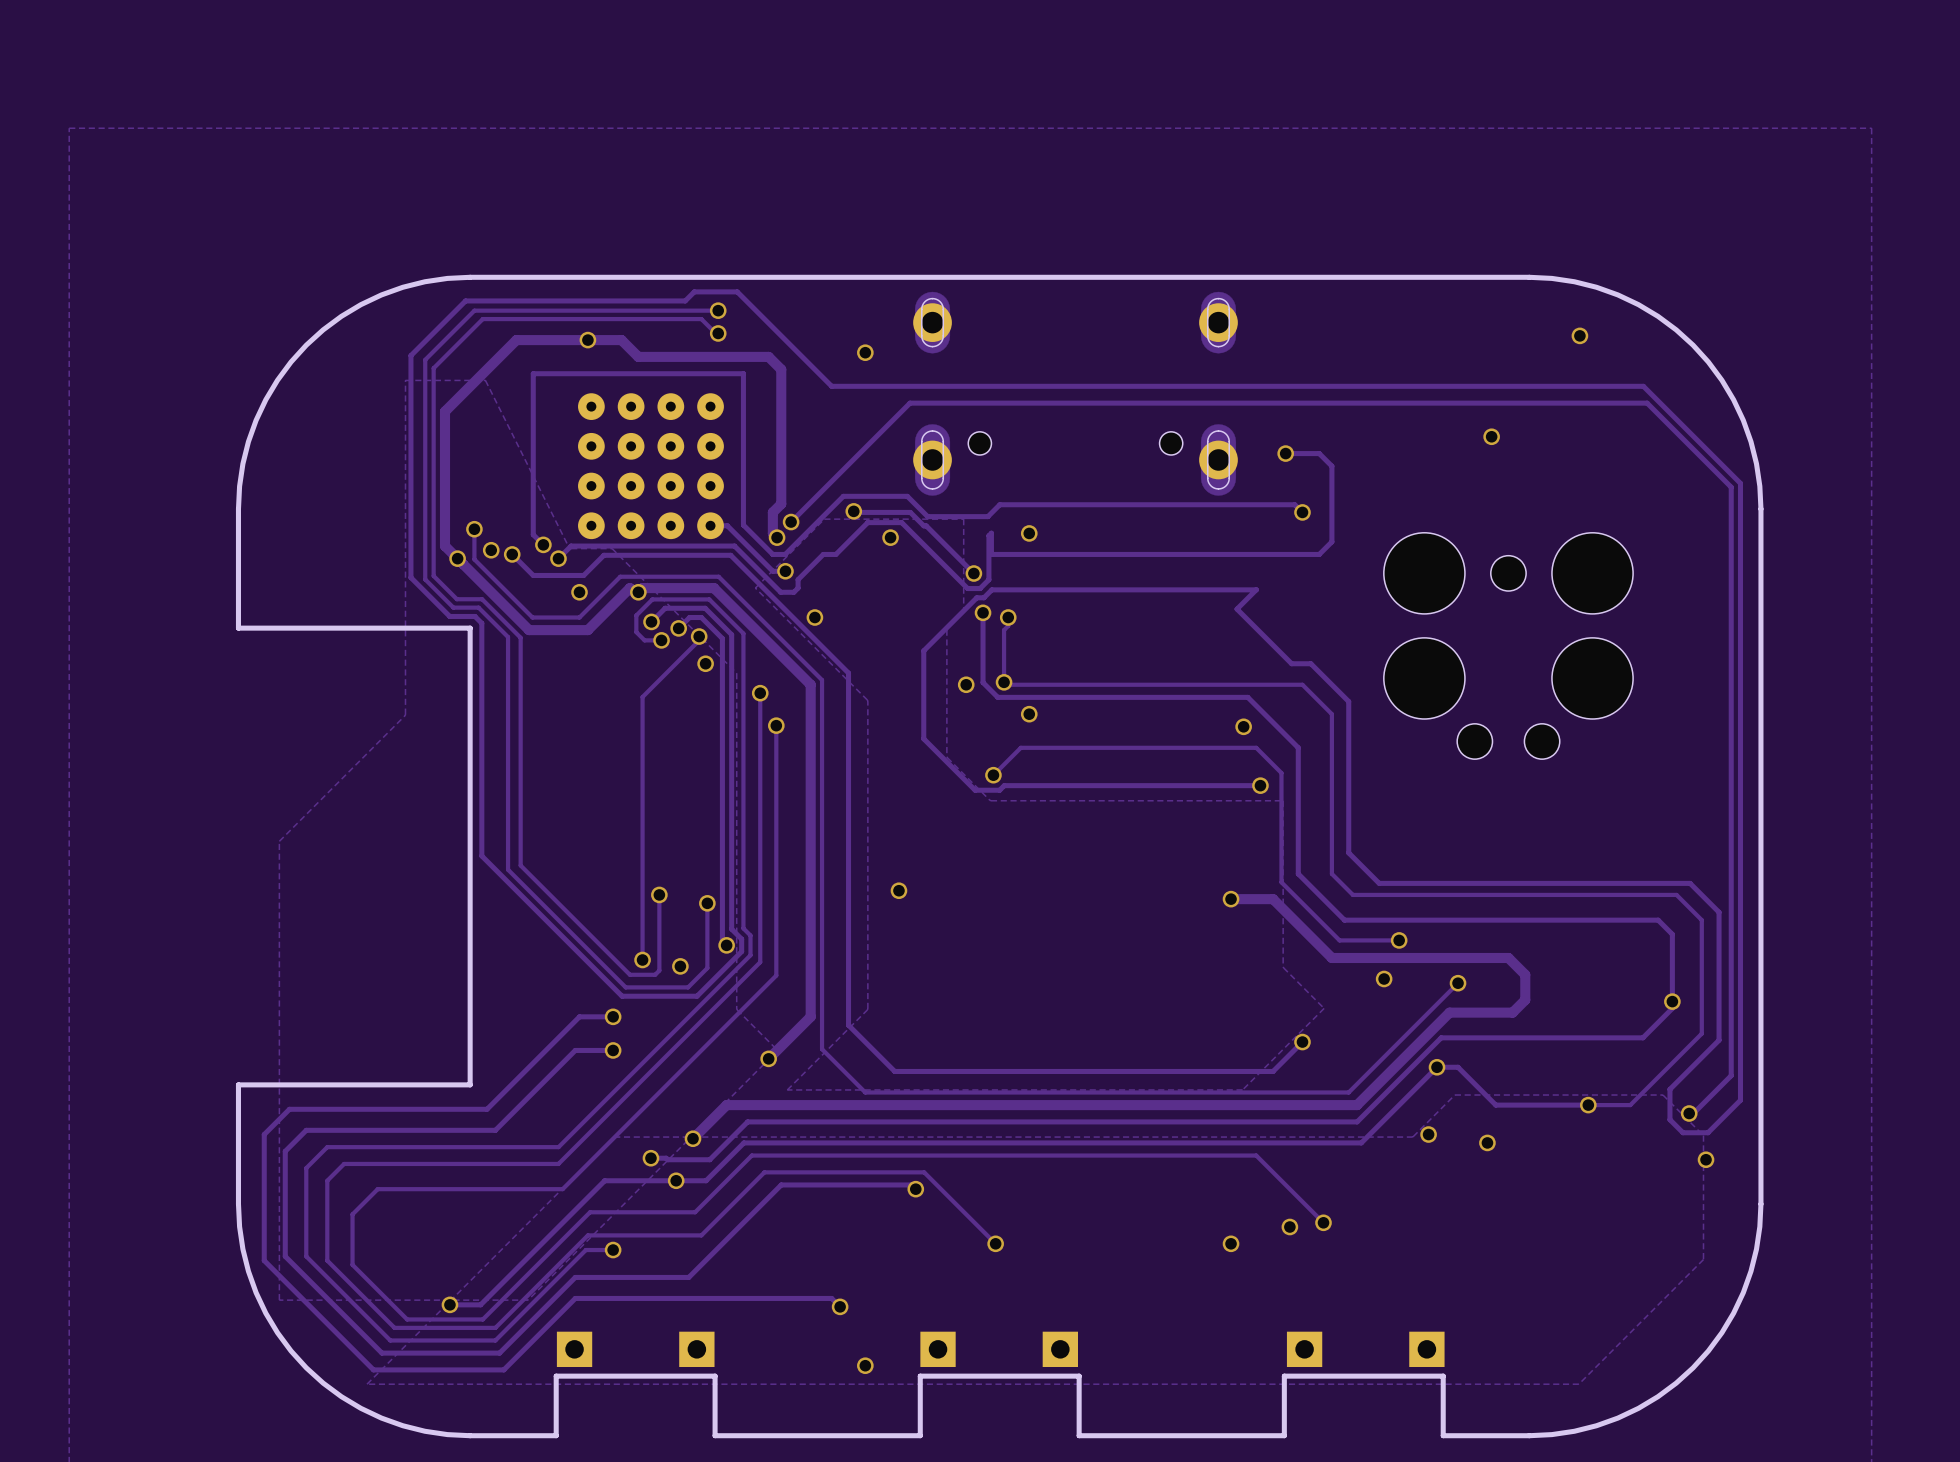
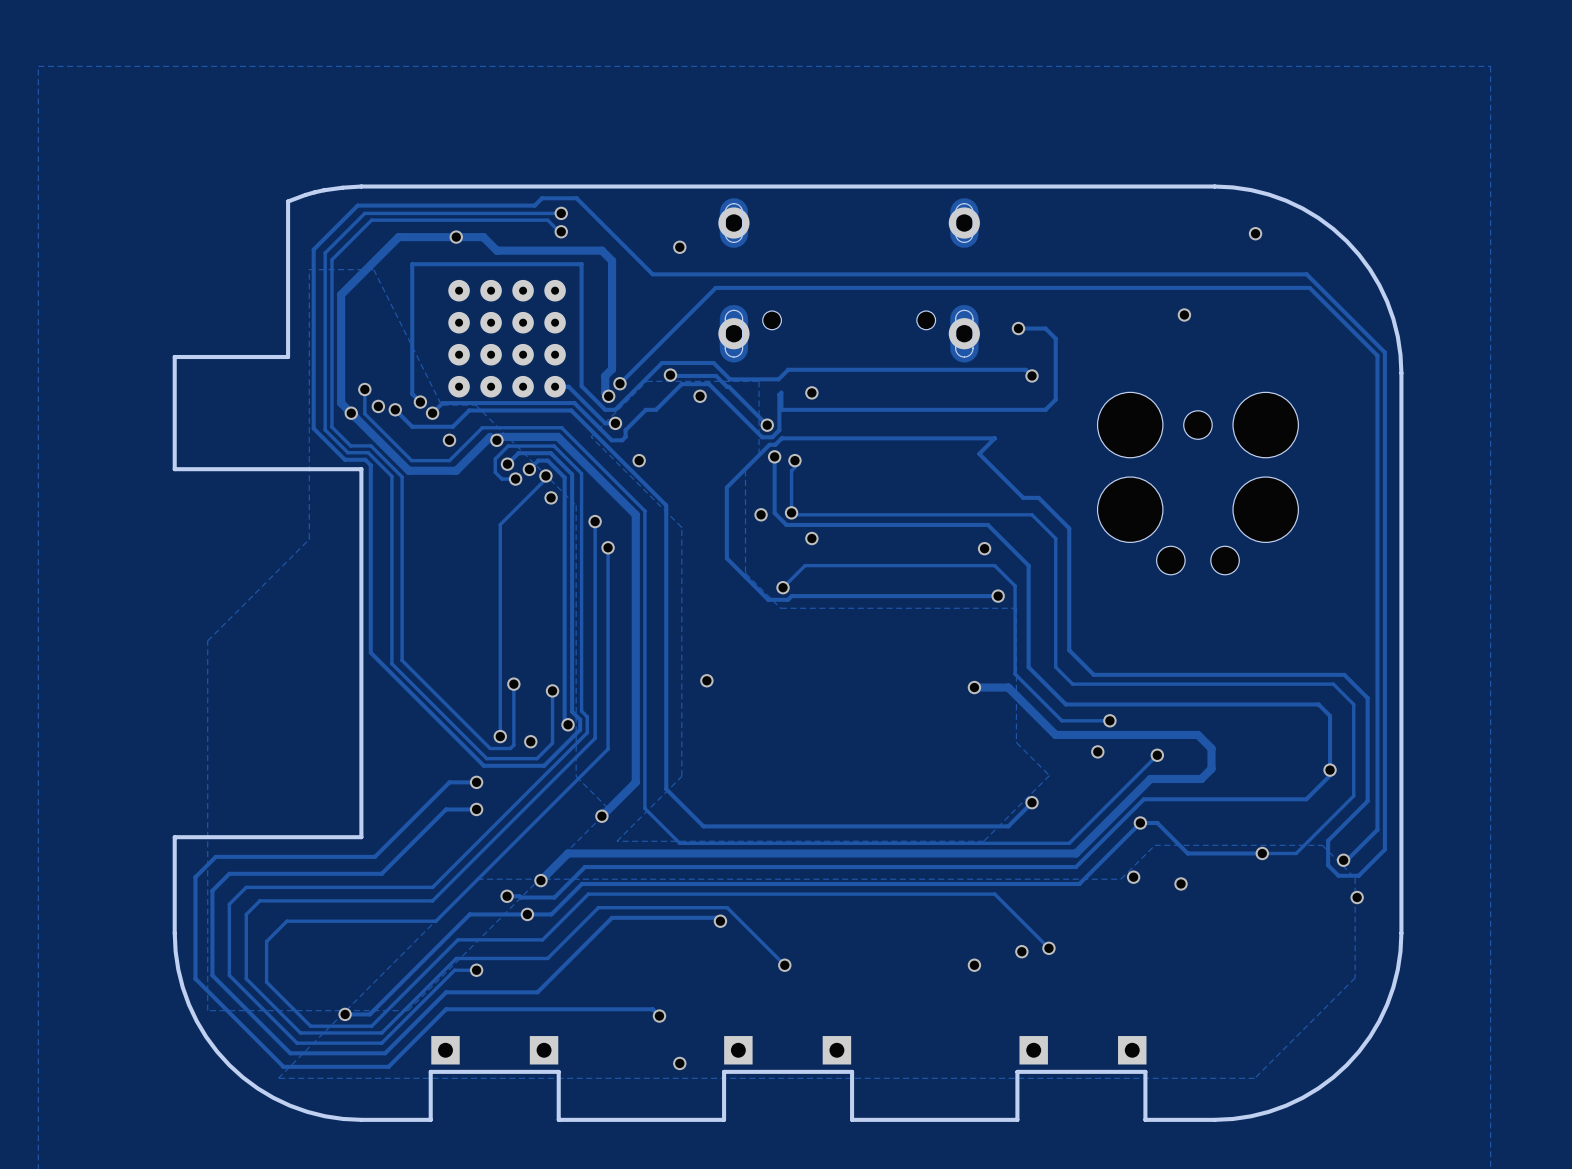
board edge: (470, 277) (424, 281) (381, 294) (341, 316) (306, 345) (277, 380) (256, 420) (242, 463) (238, 508) -> (361, 186) (323, 190) (288, 201) (288, 357) (174, 357) (174, 373)

